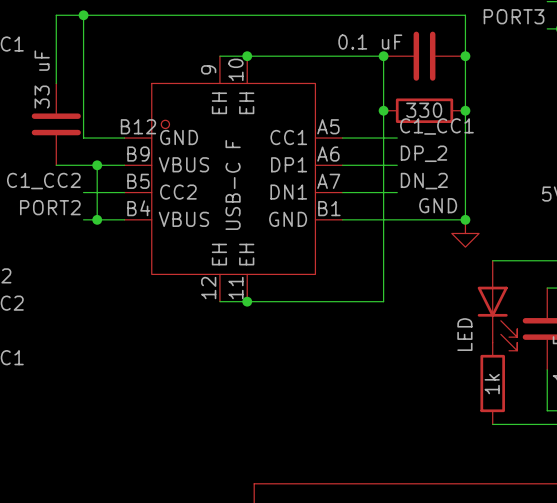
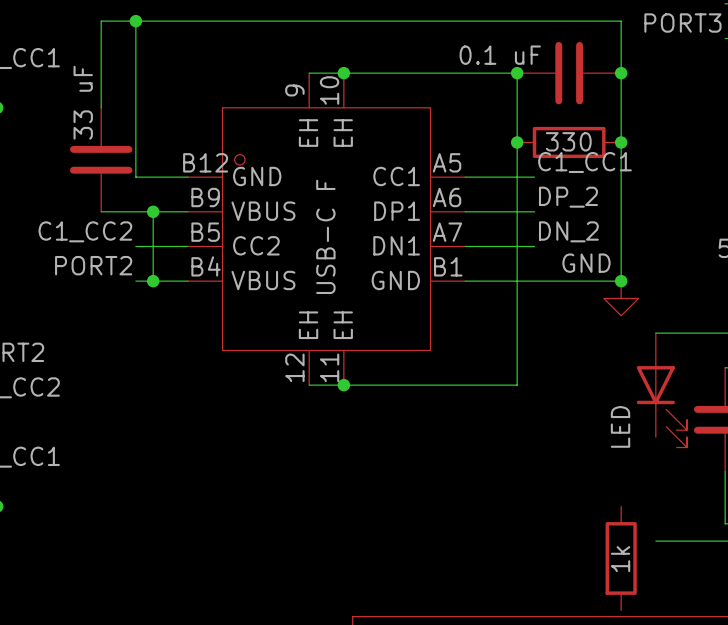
part position: (492, 383) -> (621, 558)

